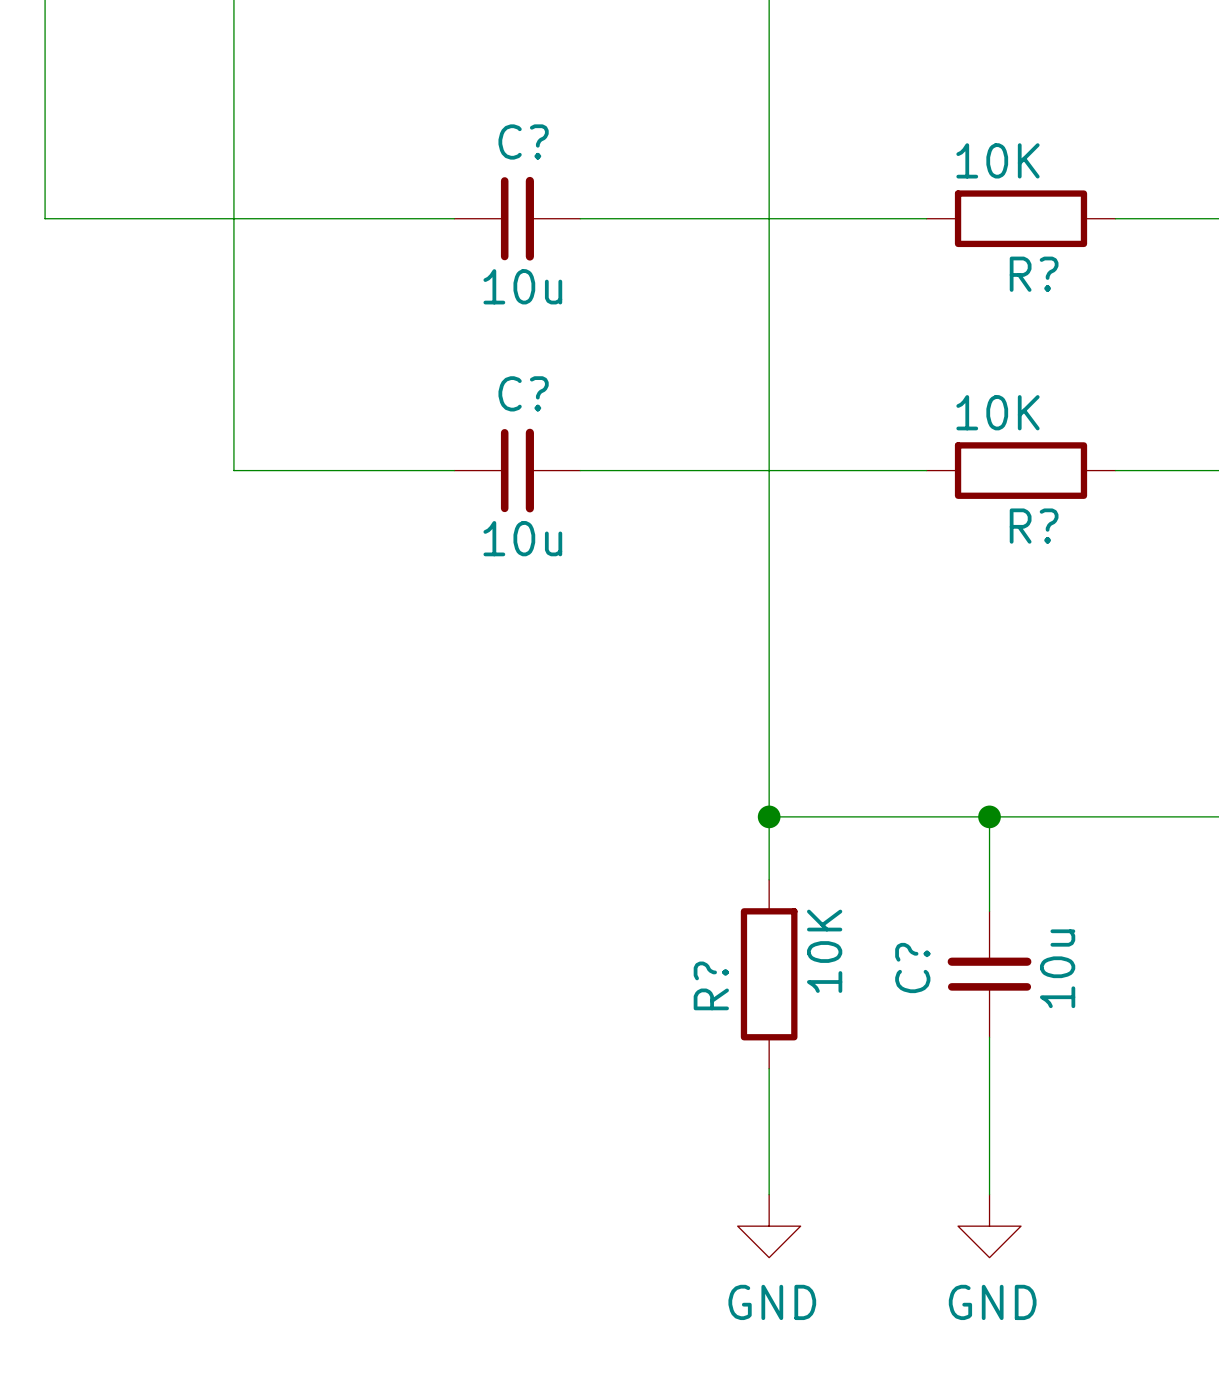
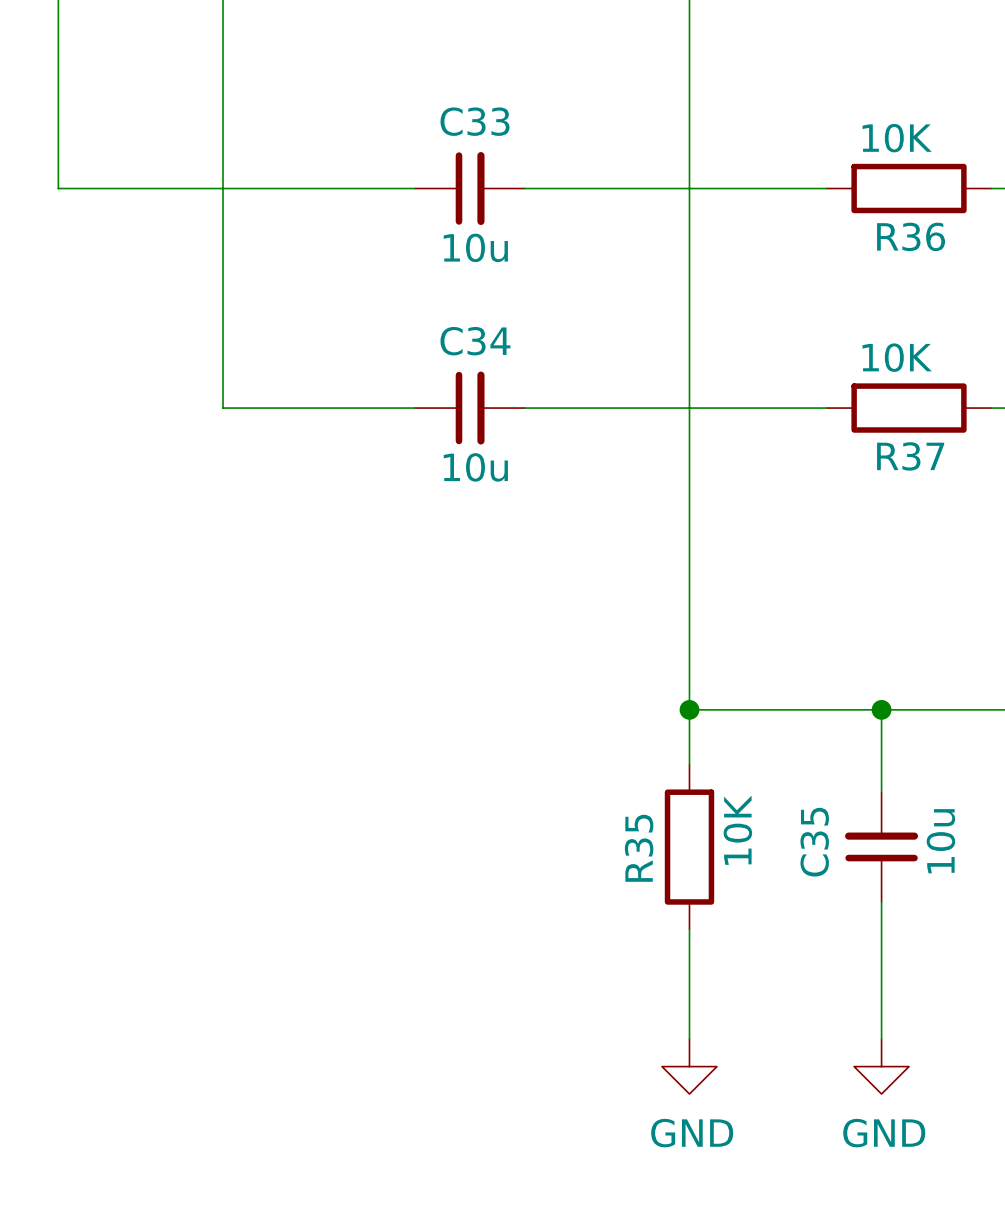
C? name: C? (523, 141) -> C33 (475, 121)
R? name: R? (1034, 274) -> R36 (911, 236)
C? name: C? (523, 393) -> C34 (475, 341)
R? name: R? (1034, 526) -> R37 (910, 456)
C? name: C? (912, 968) -> C35 (814, 842)
R? name: R? (711, 985) -> R35 (639, 848)

